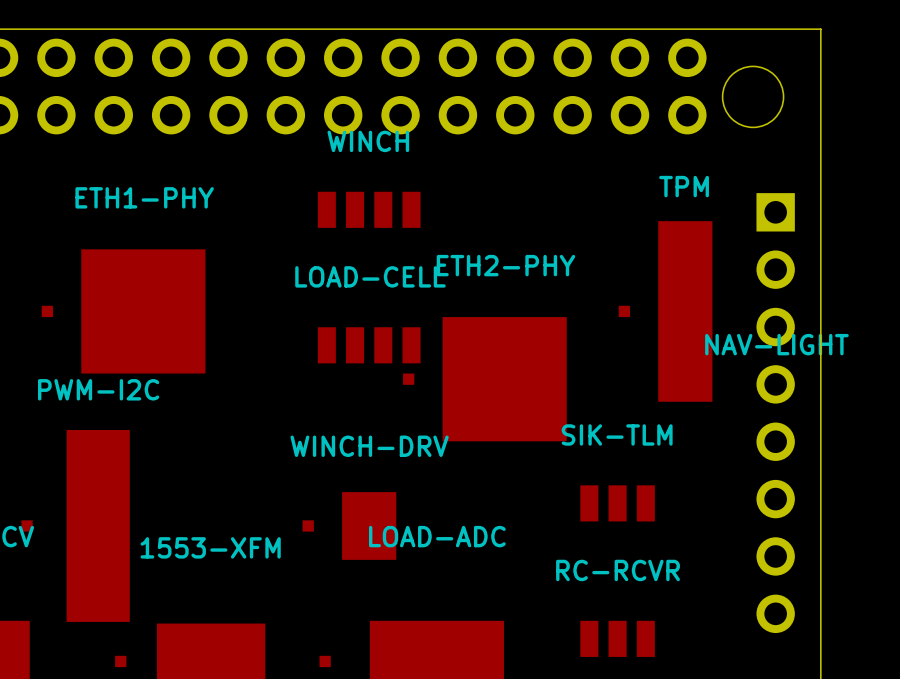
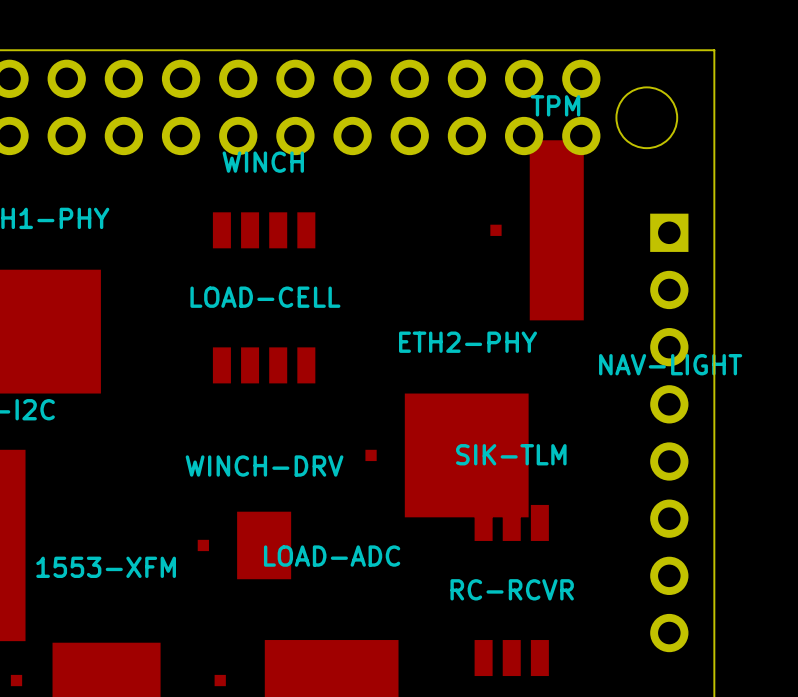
TPM position: (665, 311) -> (537, 230)
ETH2-PHY position: (484, 379) -> (447, 455)

